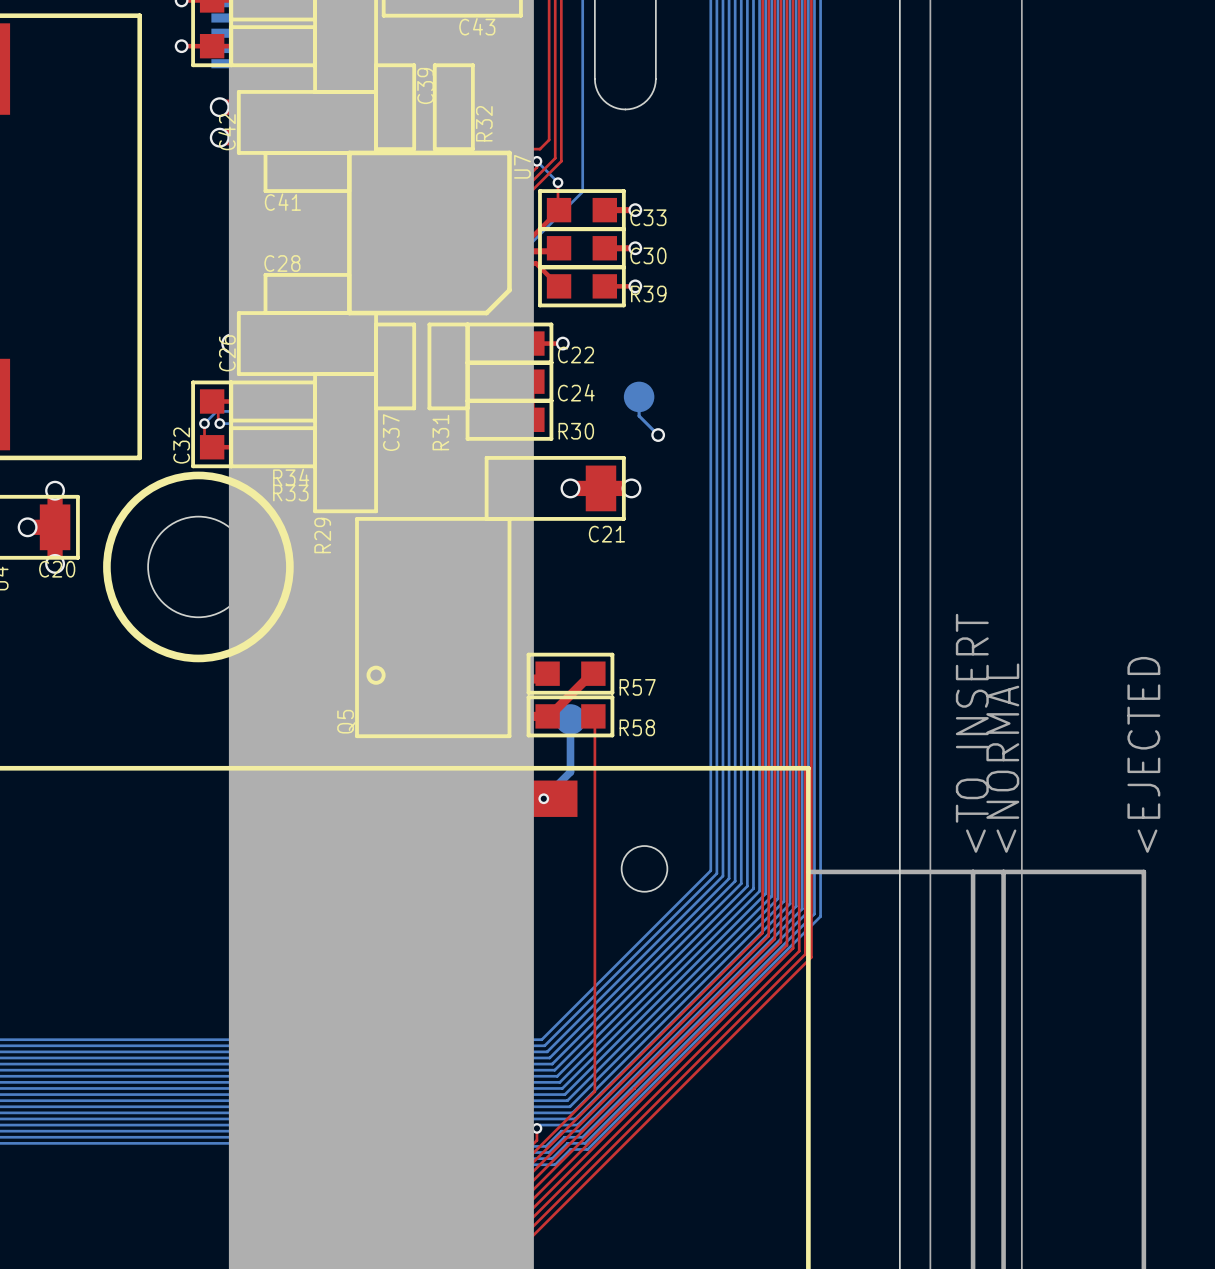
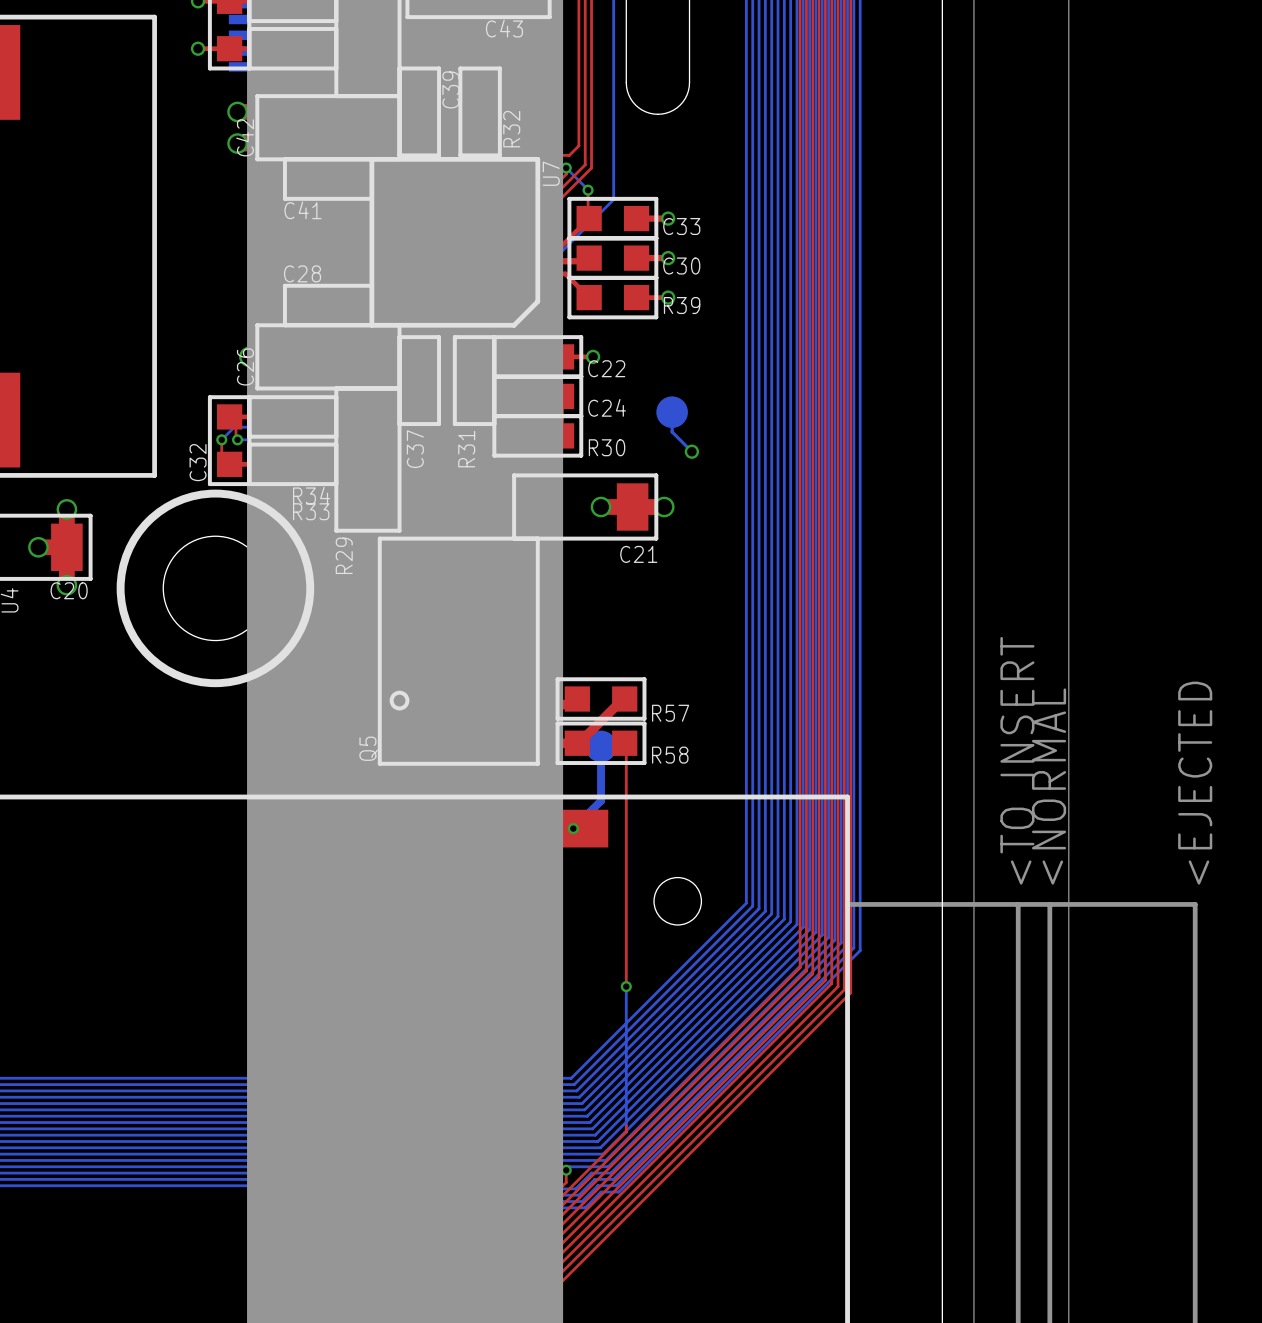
top track: (594, 951) (594, 1085) -> none
bottom track: none -> (626, 986) (626, 1125)
via: none -> (626, 986)

